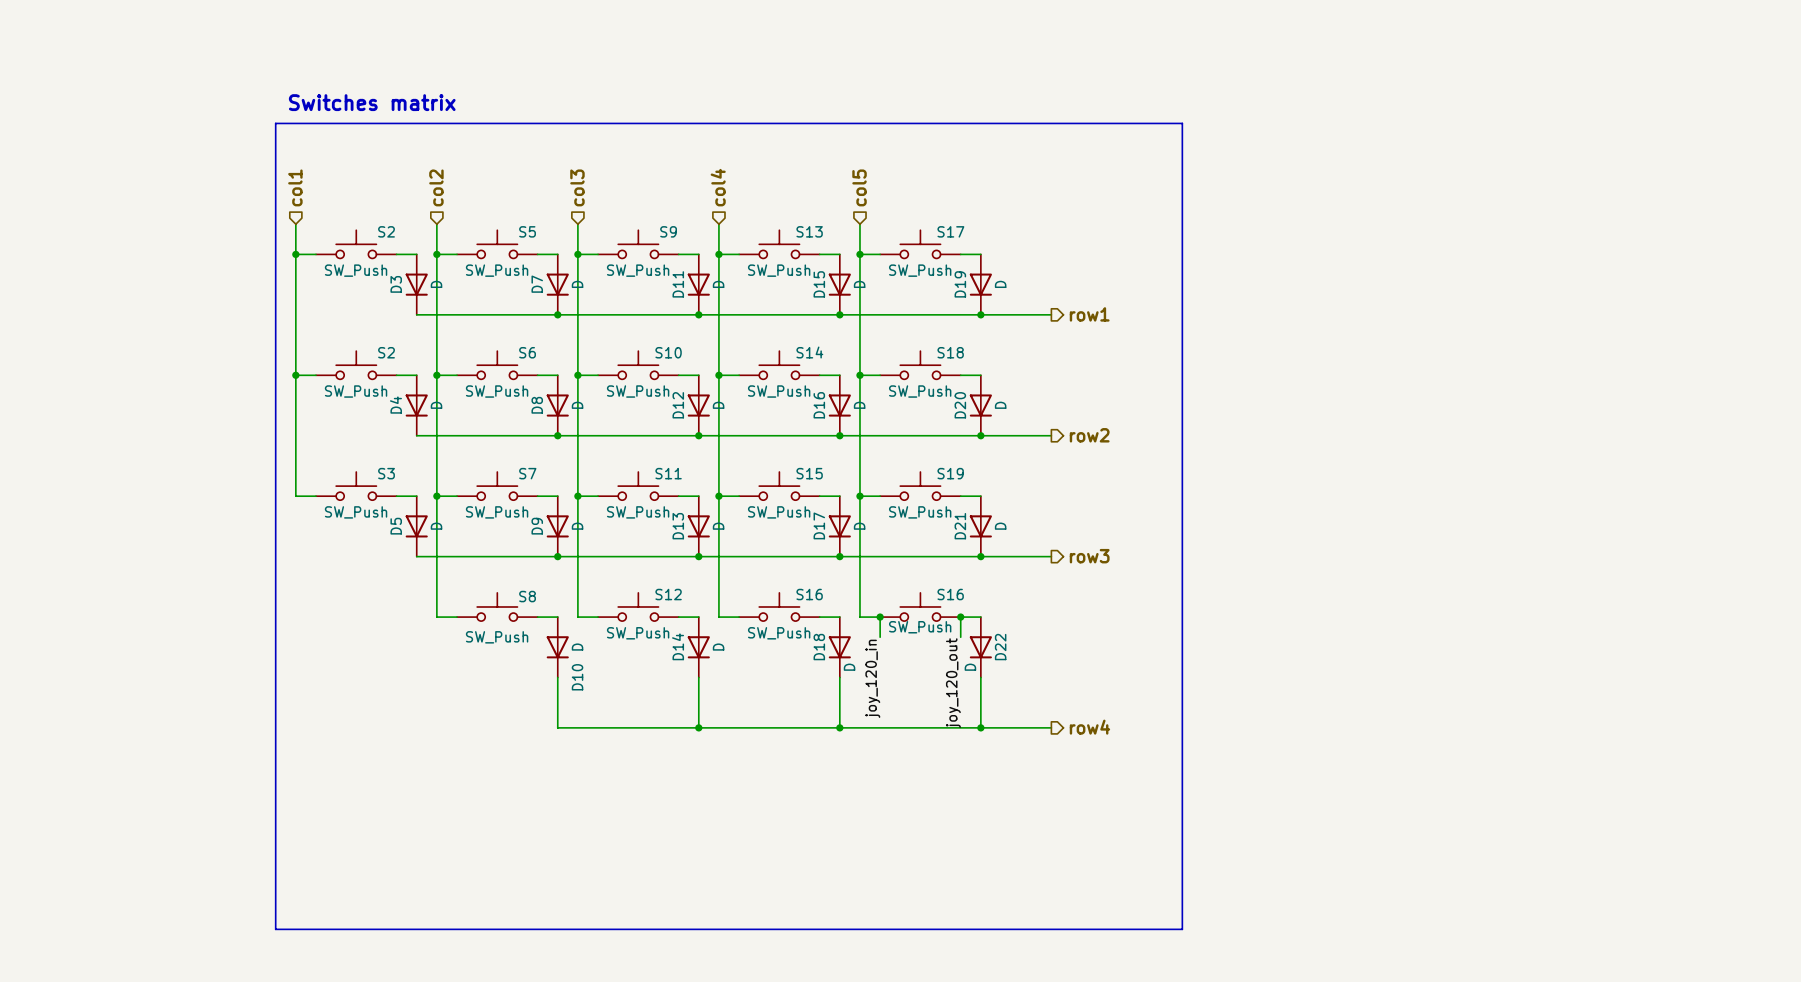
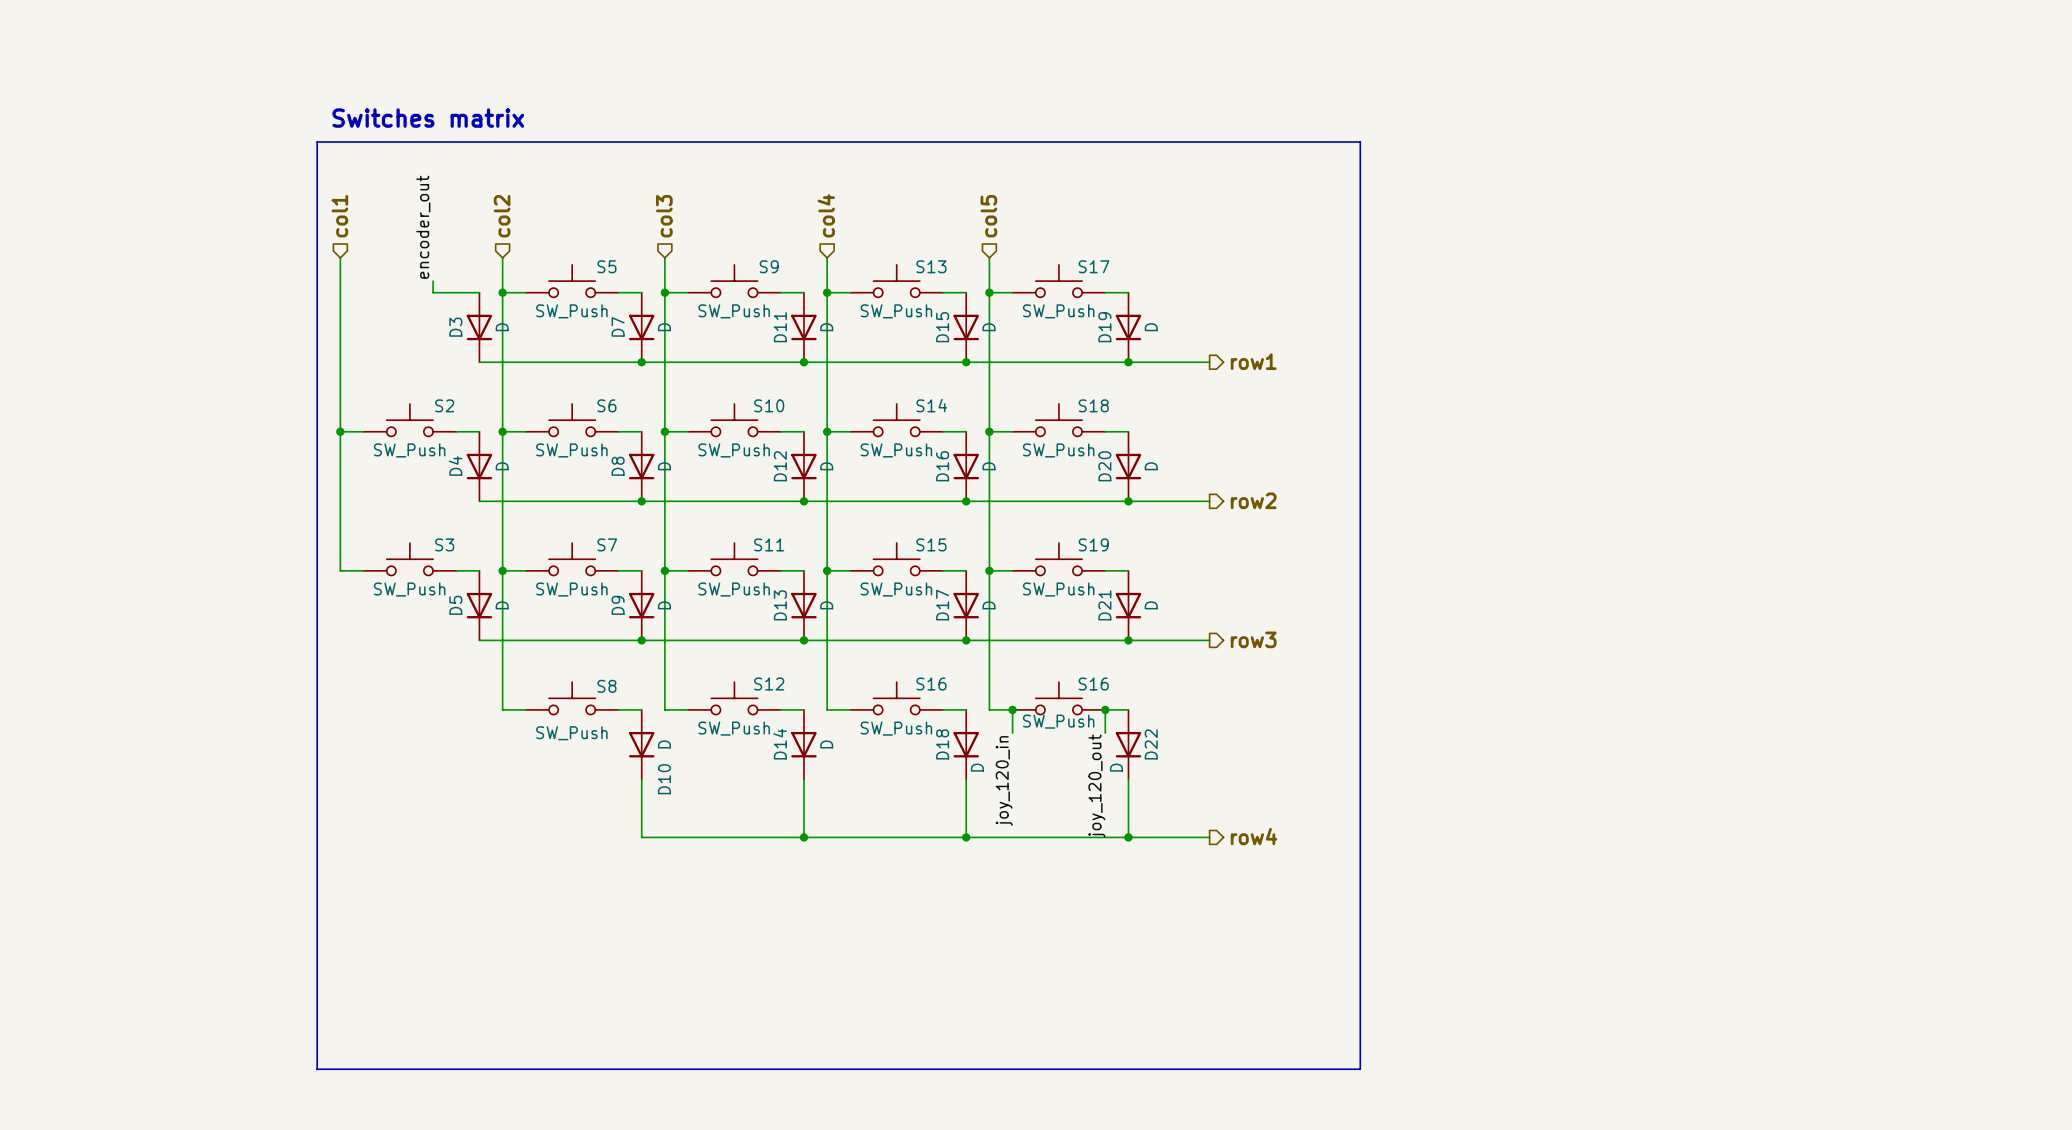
label: none -> encoder_out (423, 227)
S2: SW_Push (356, 244) -> none
wire: (295, 254) (315, 254) -> none
junction: (295, 254) -> none

